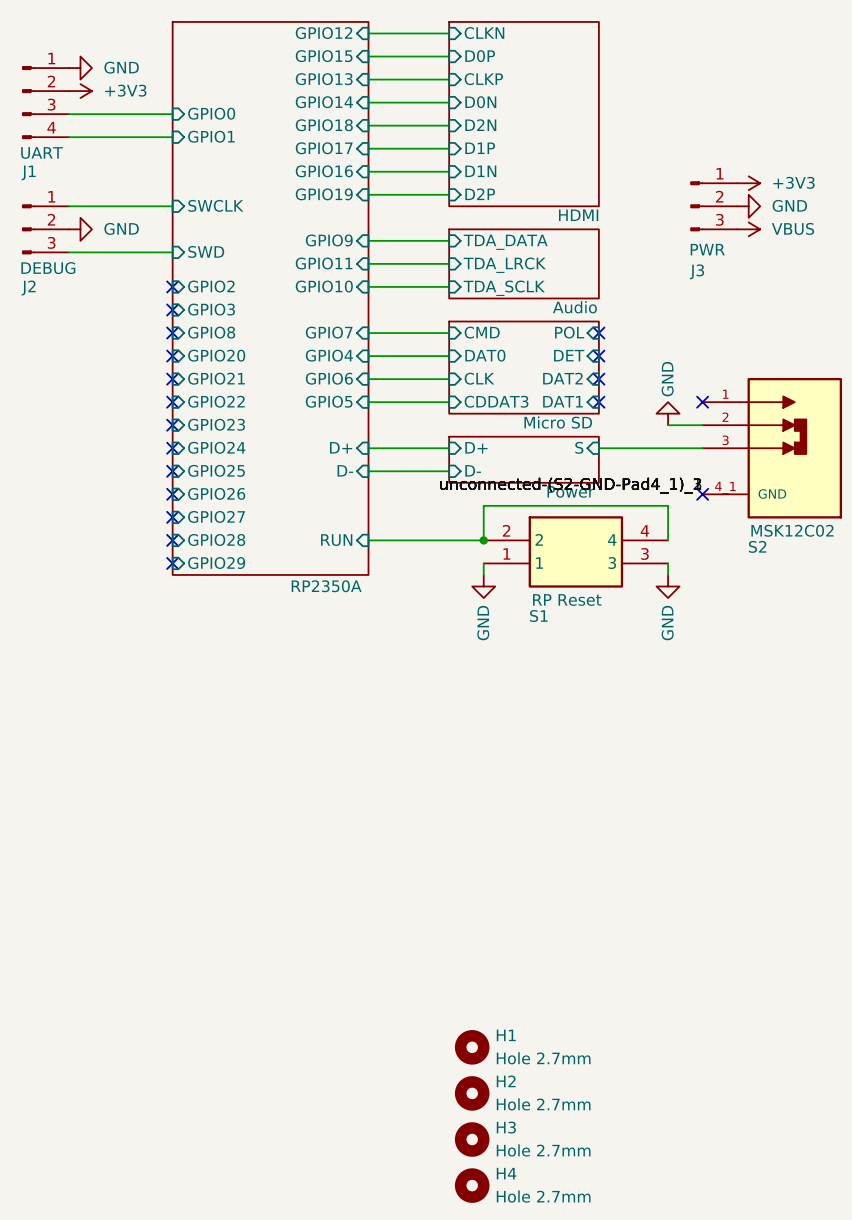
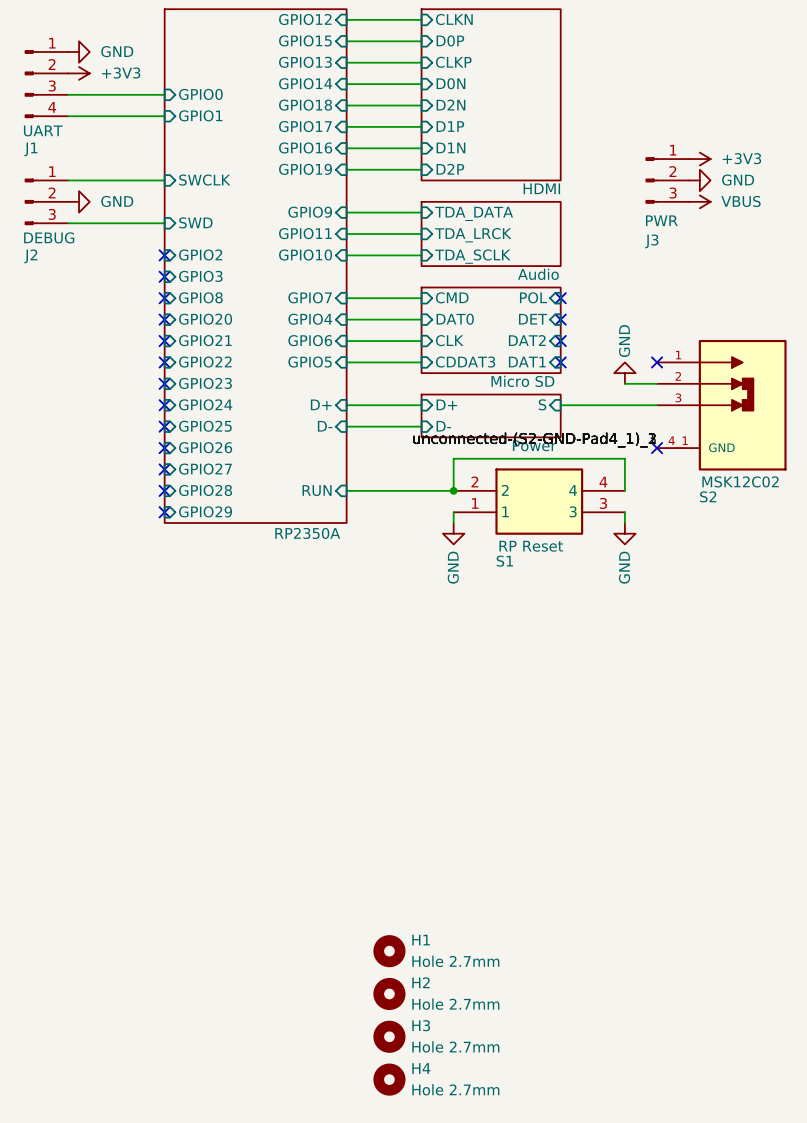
H1 position: (472, 1047) -> (389, 951)
H2 position: (472, 1093) -> (389, 993)
H3 position: (472, 1139) -> (389, 1036)
H4 position: (472, 1185) -> (389, 1079)

